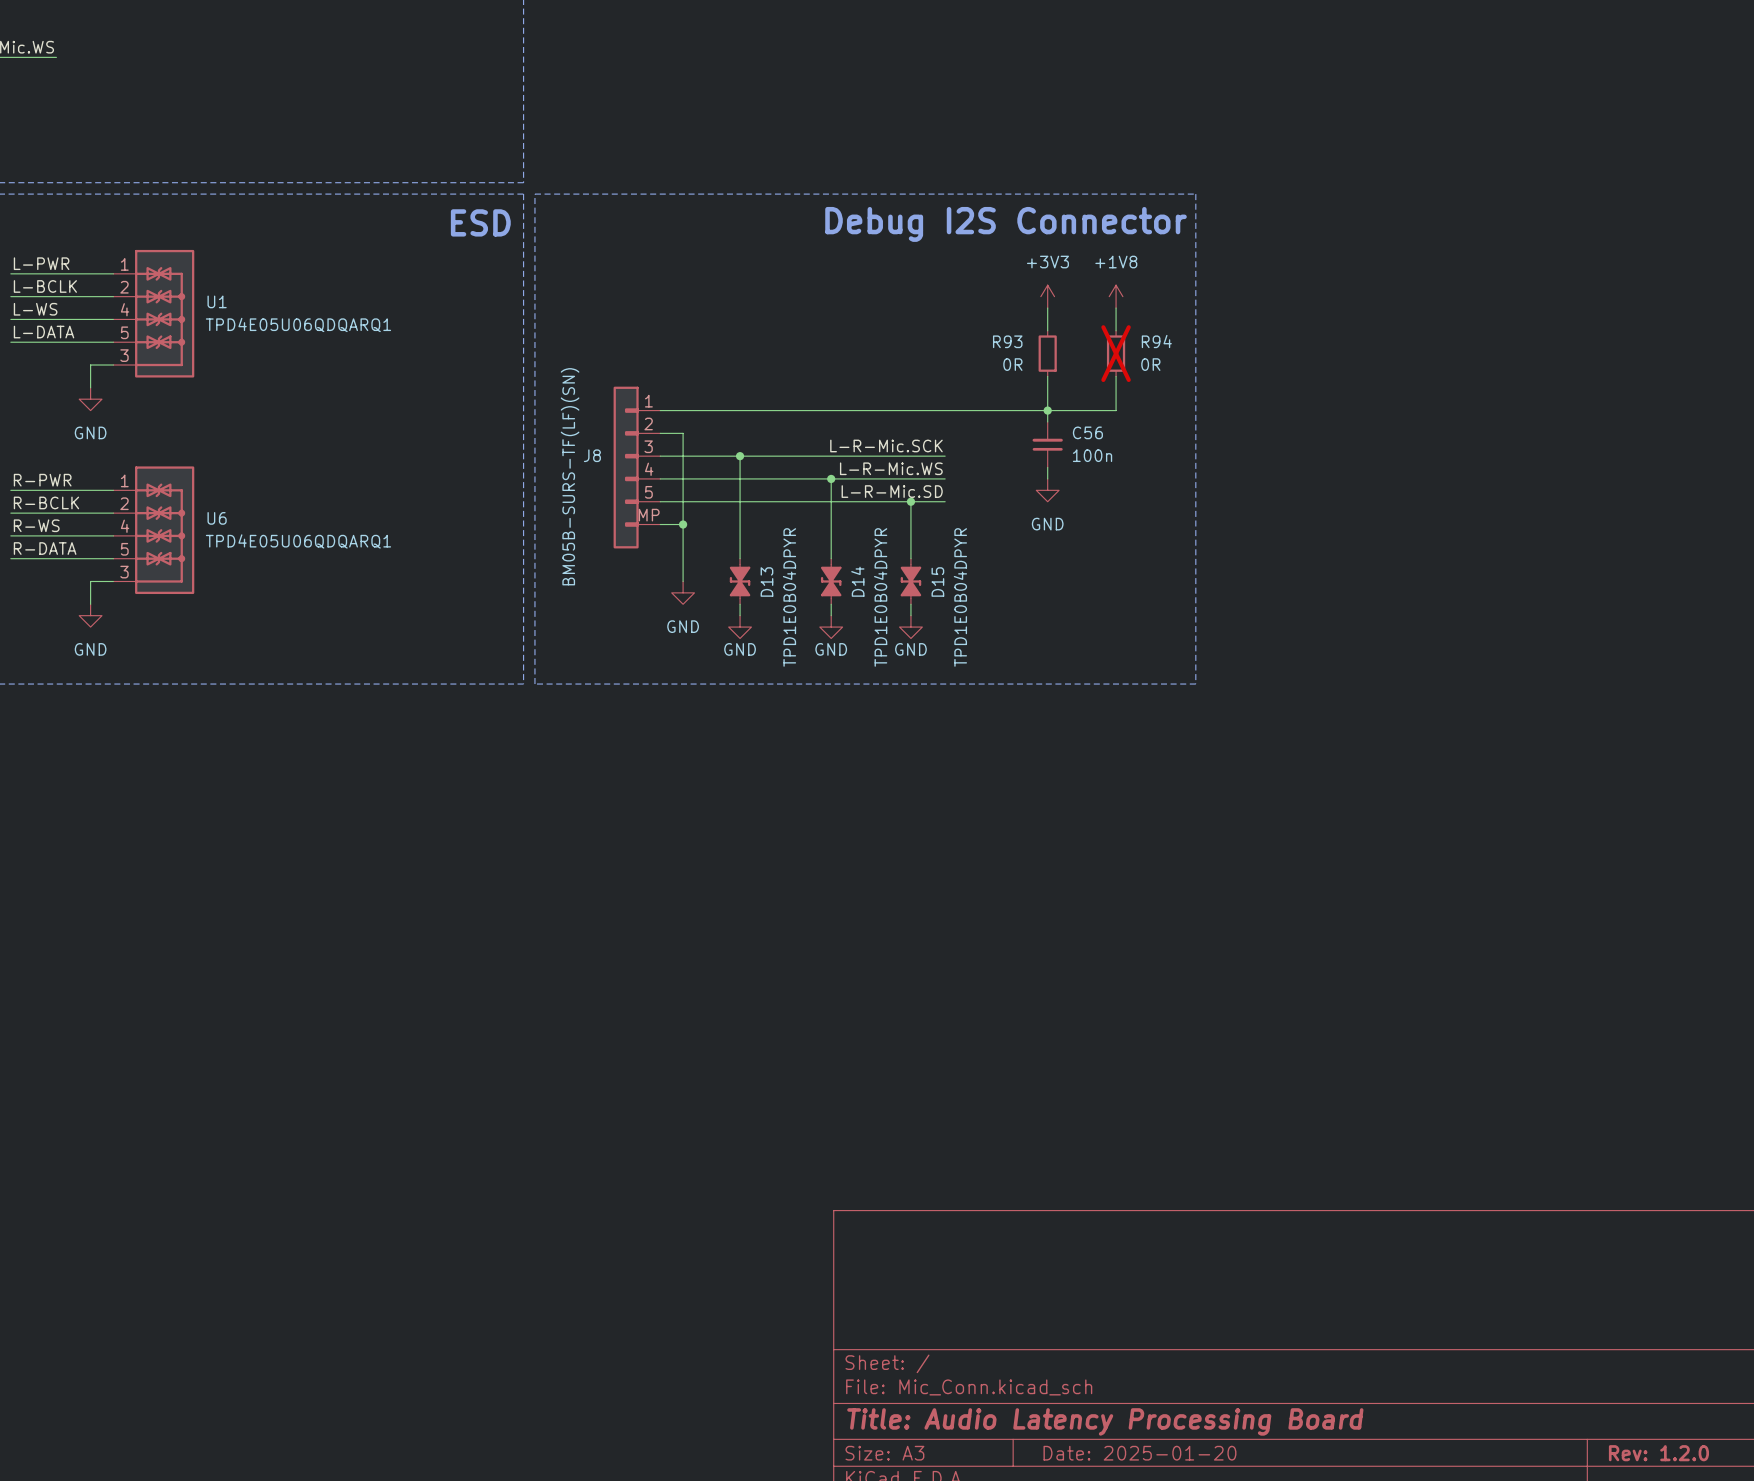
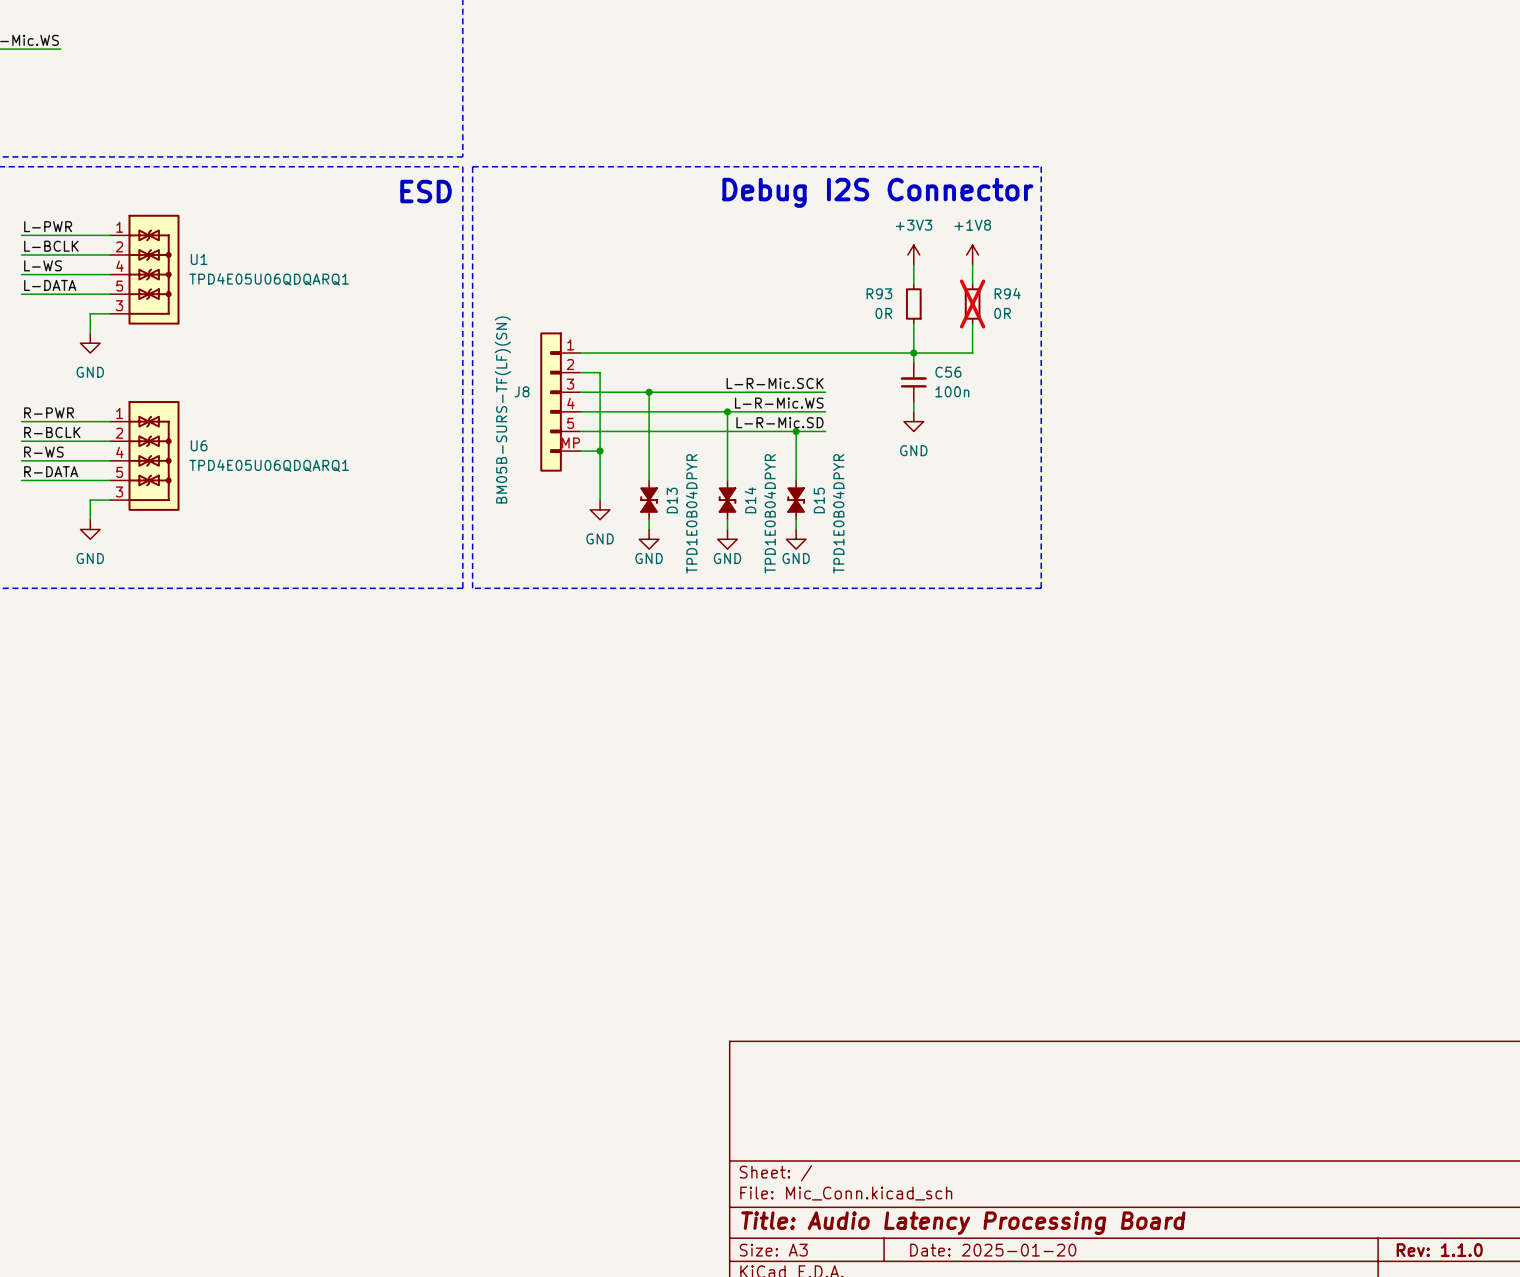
title block: Rev: 1.2.0 (1658, 1453) -> Rev: 1.1.0 (1439, 1250)

